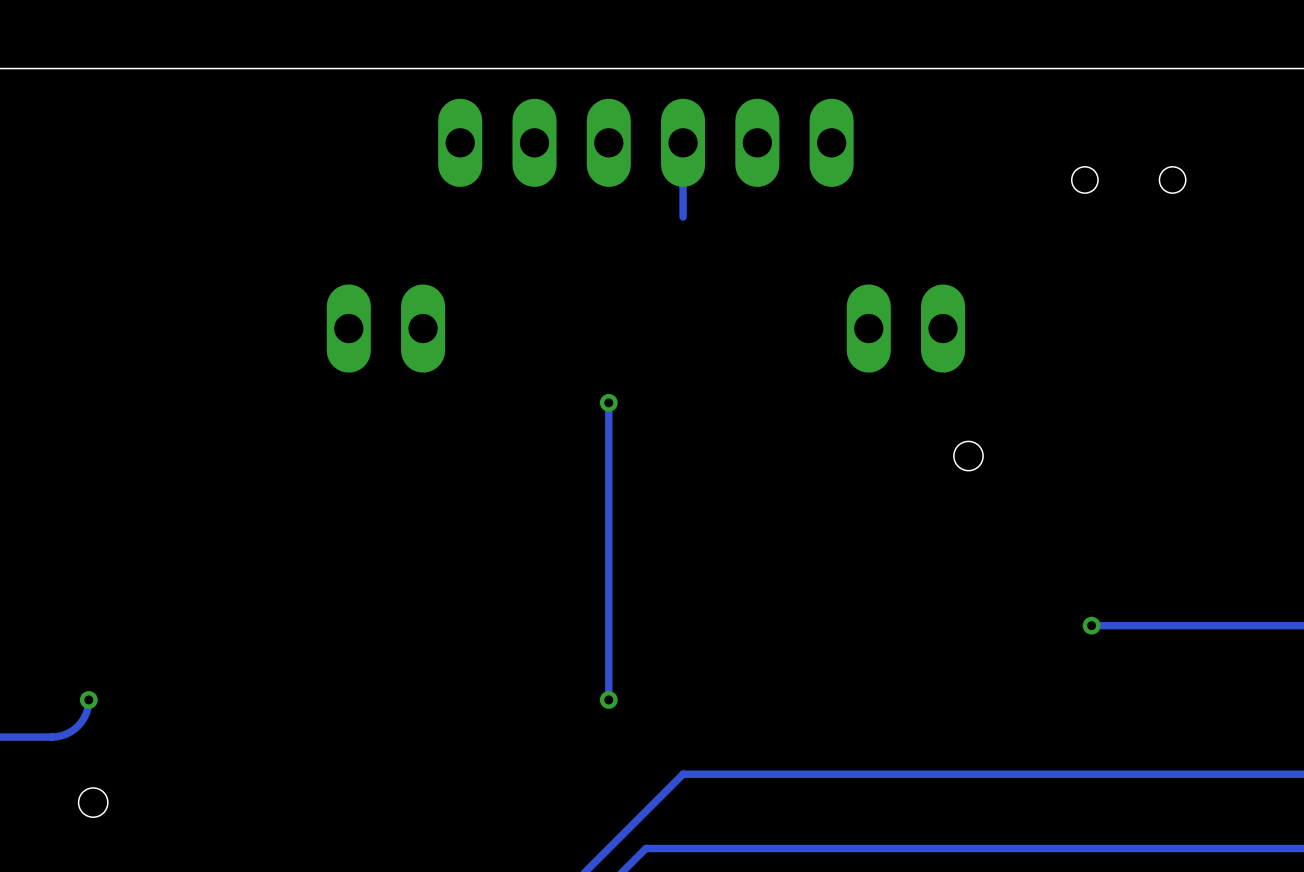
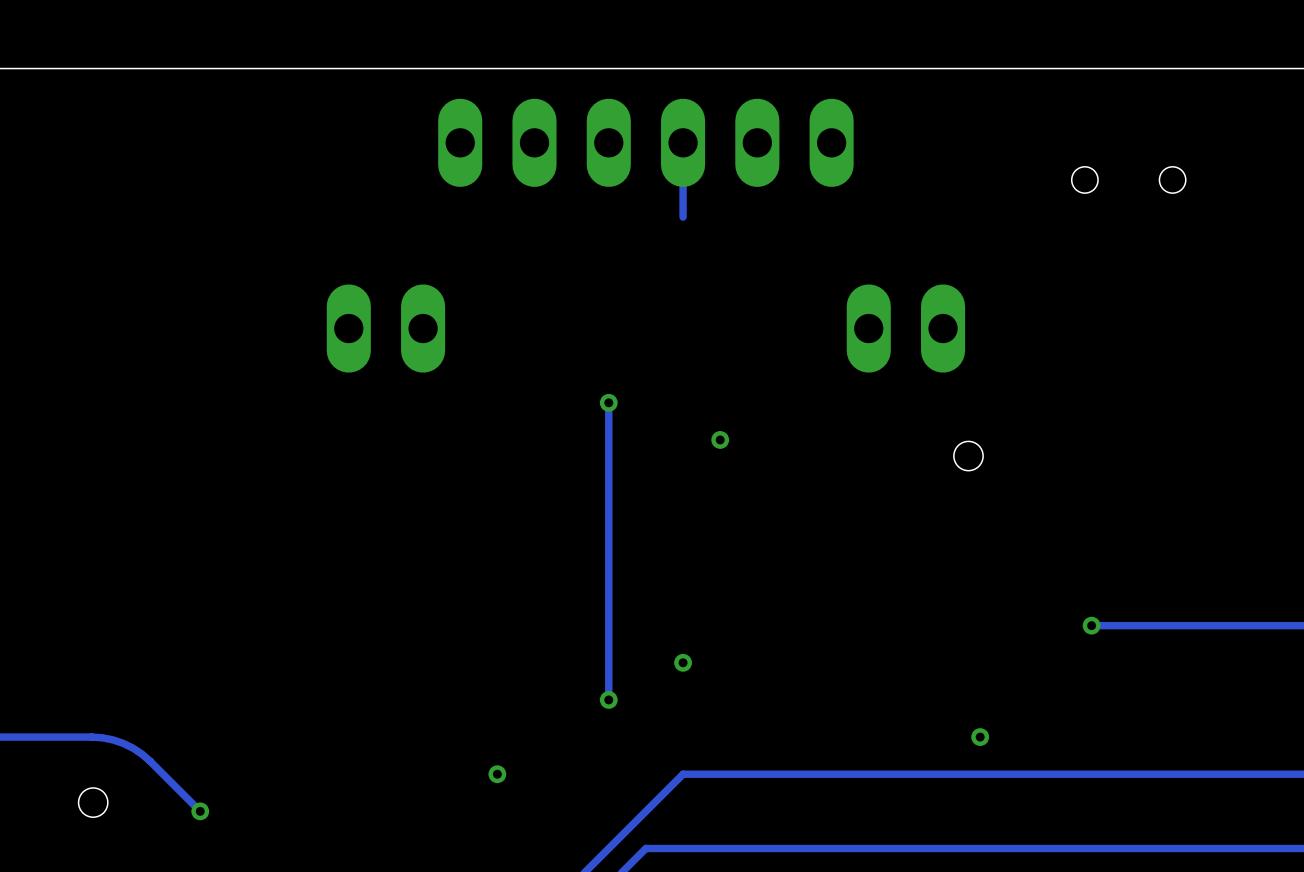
via: none -> (720, 439)
via: none -> (683, 662)
track: (88, 699) (85, 714) (77, 726) (65, 734) (51, 737) -> (200, 811) (150, 761) (133, 748) (102, 737) (51, 737)
via position: (88, 699) -> (200, 811)
via: none -> (980, 737)
via: none -> (497, 774)

